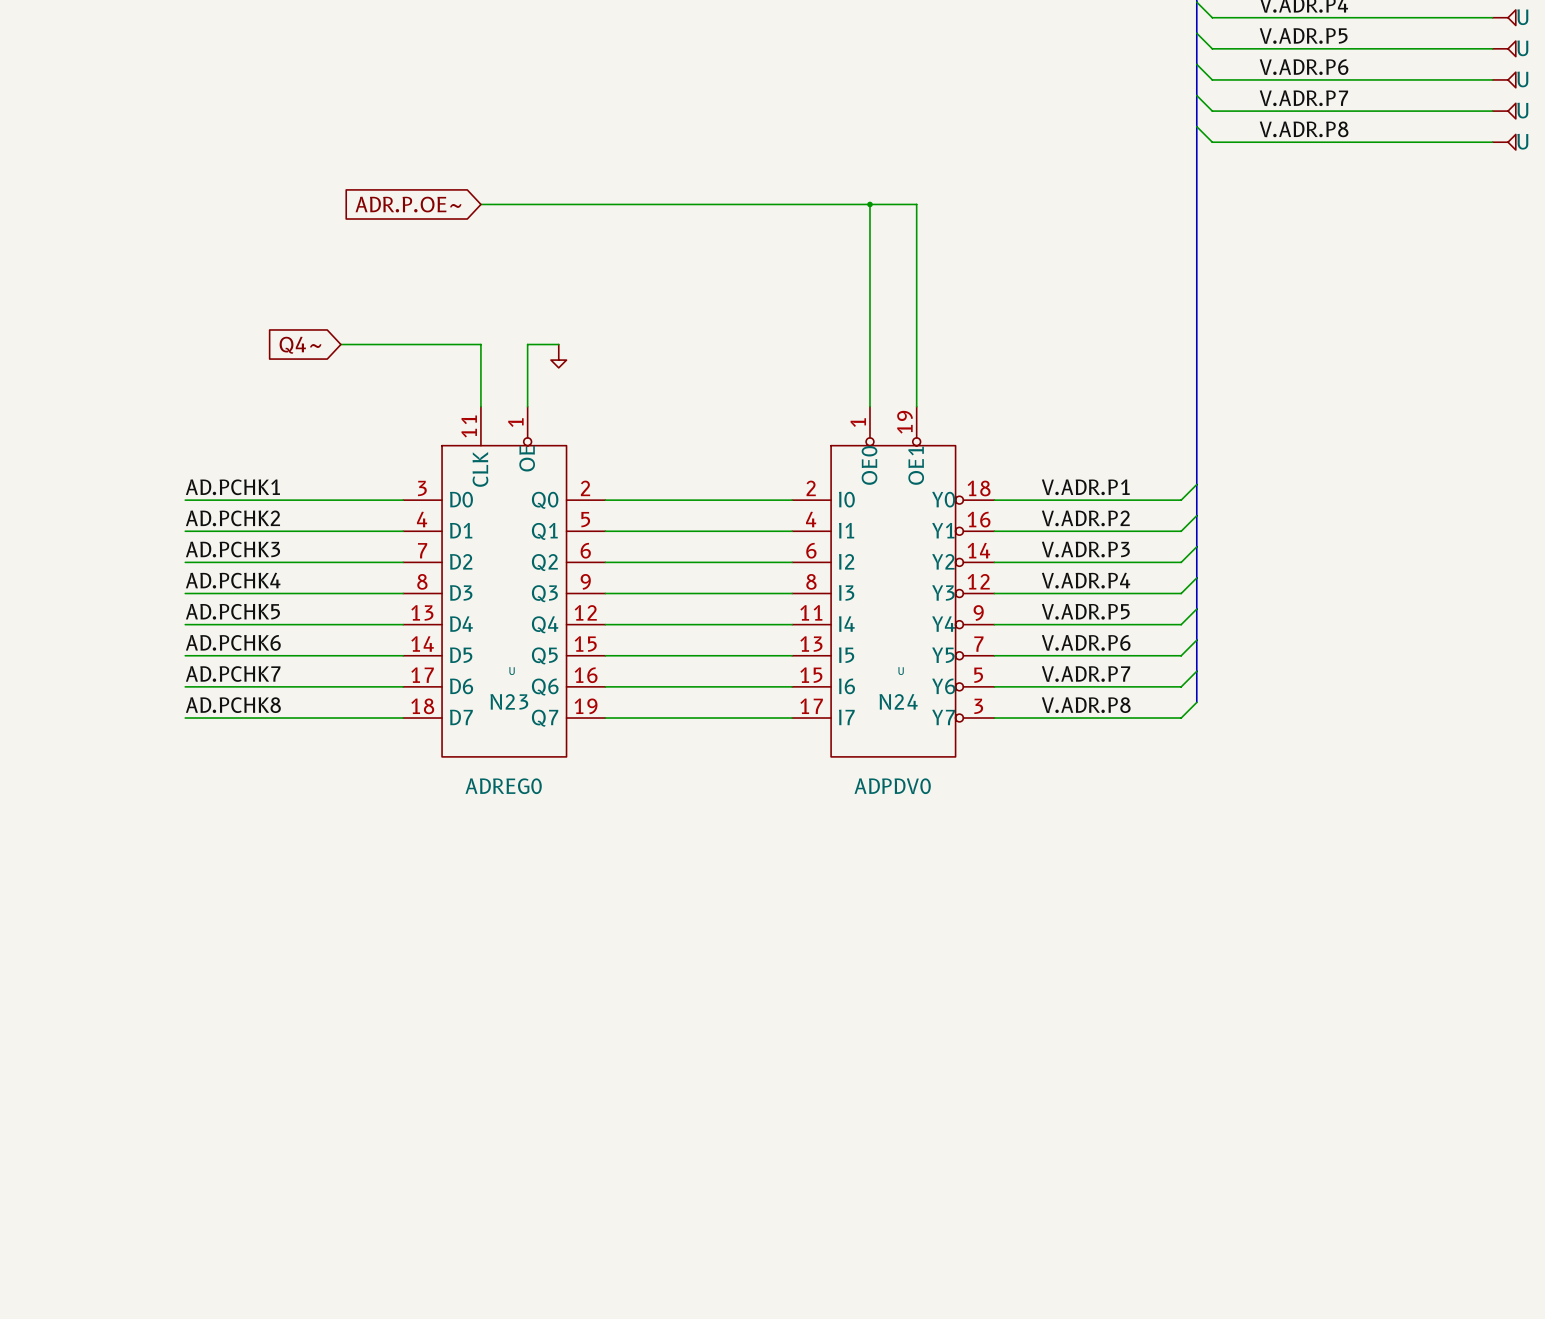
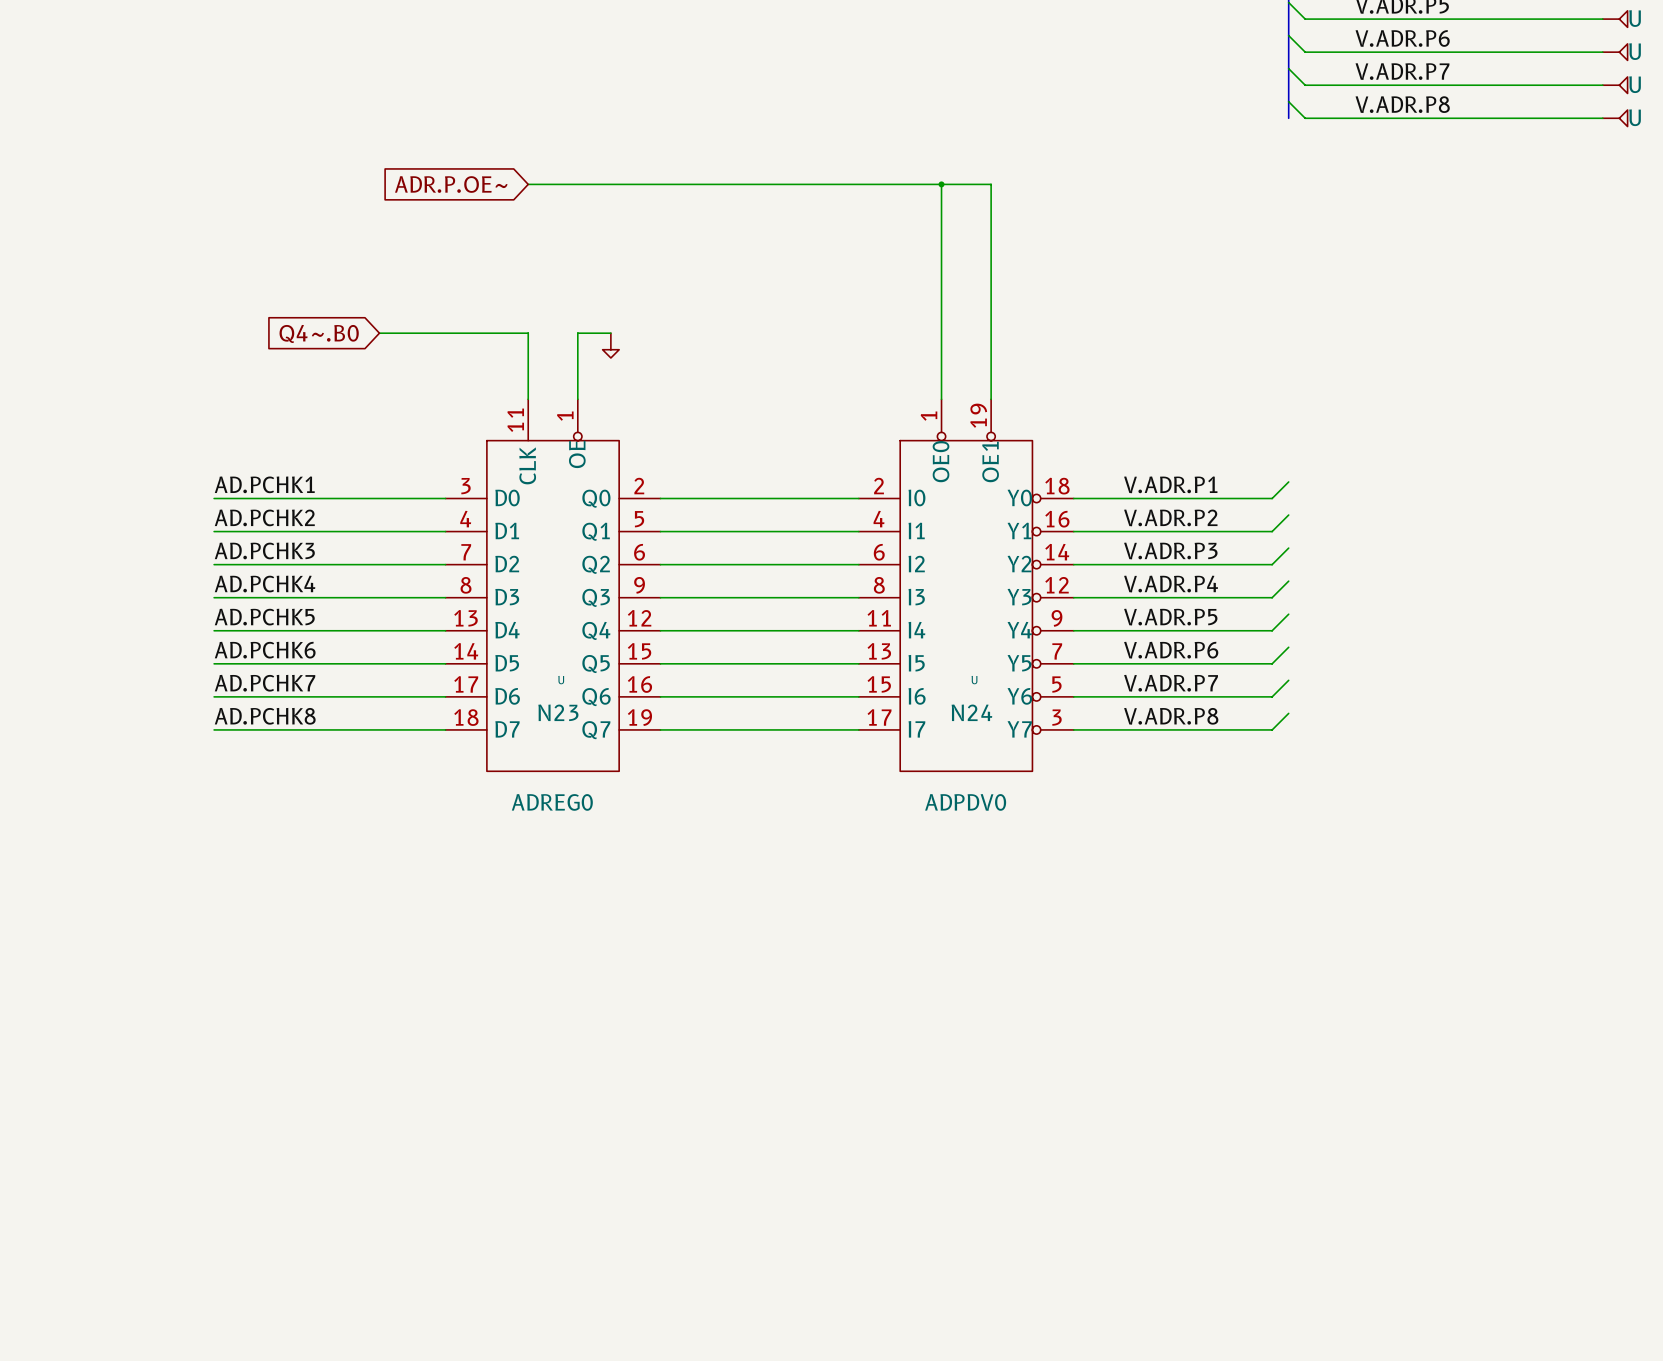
bus: (1196, 142) (1196, 702) -> none
global label: Q4~ (300, 345) -> Q4~.B0 (319, 333)

